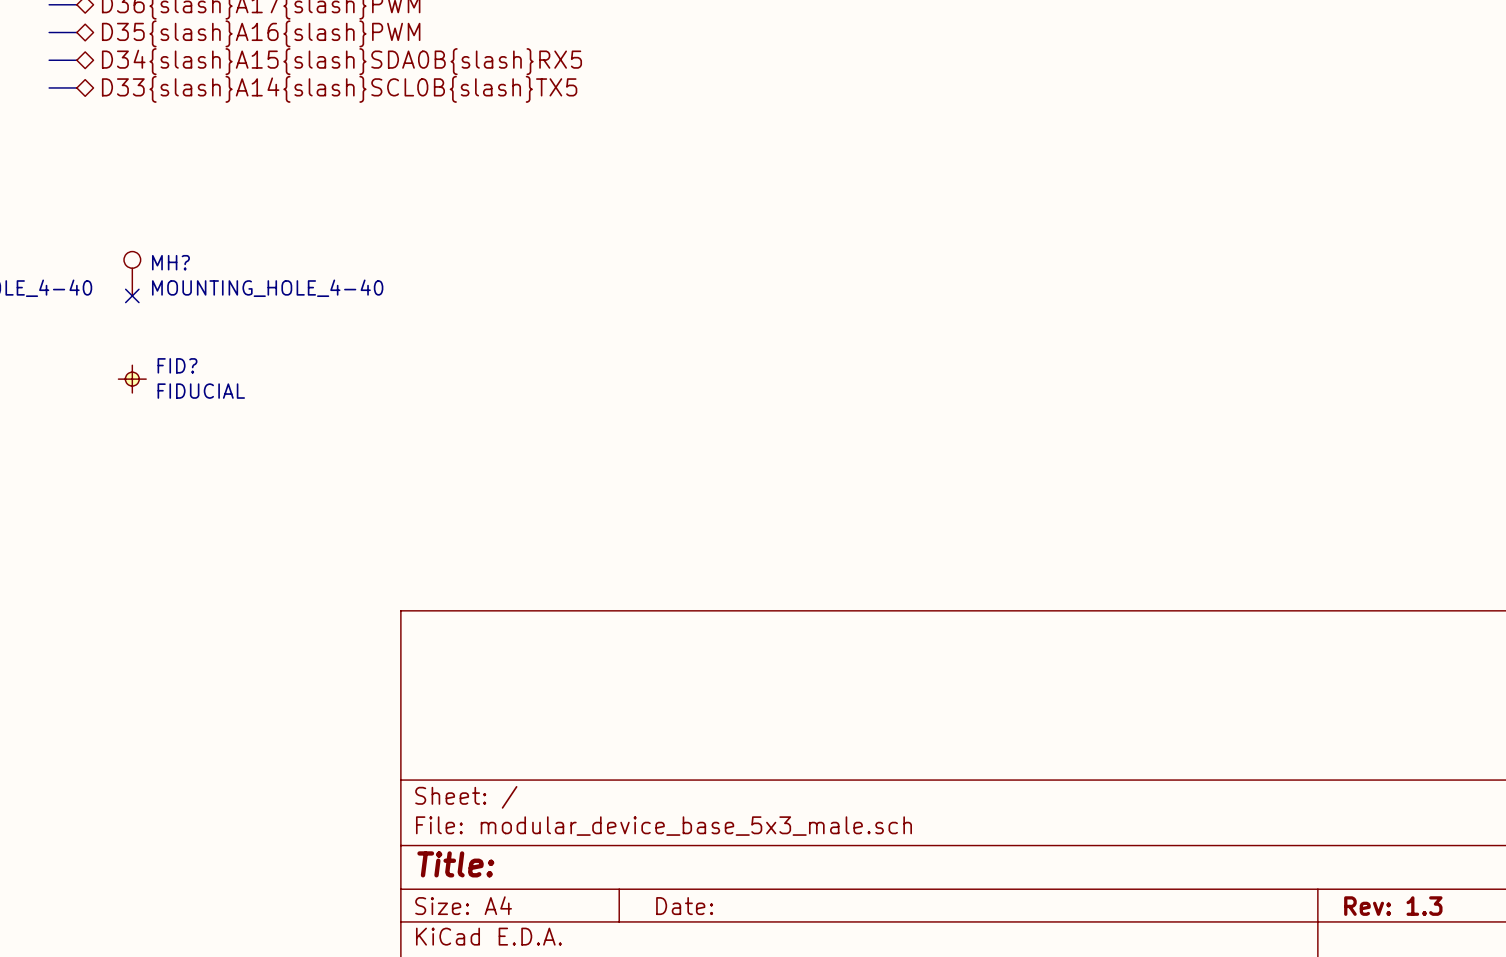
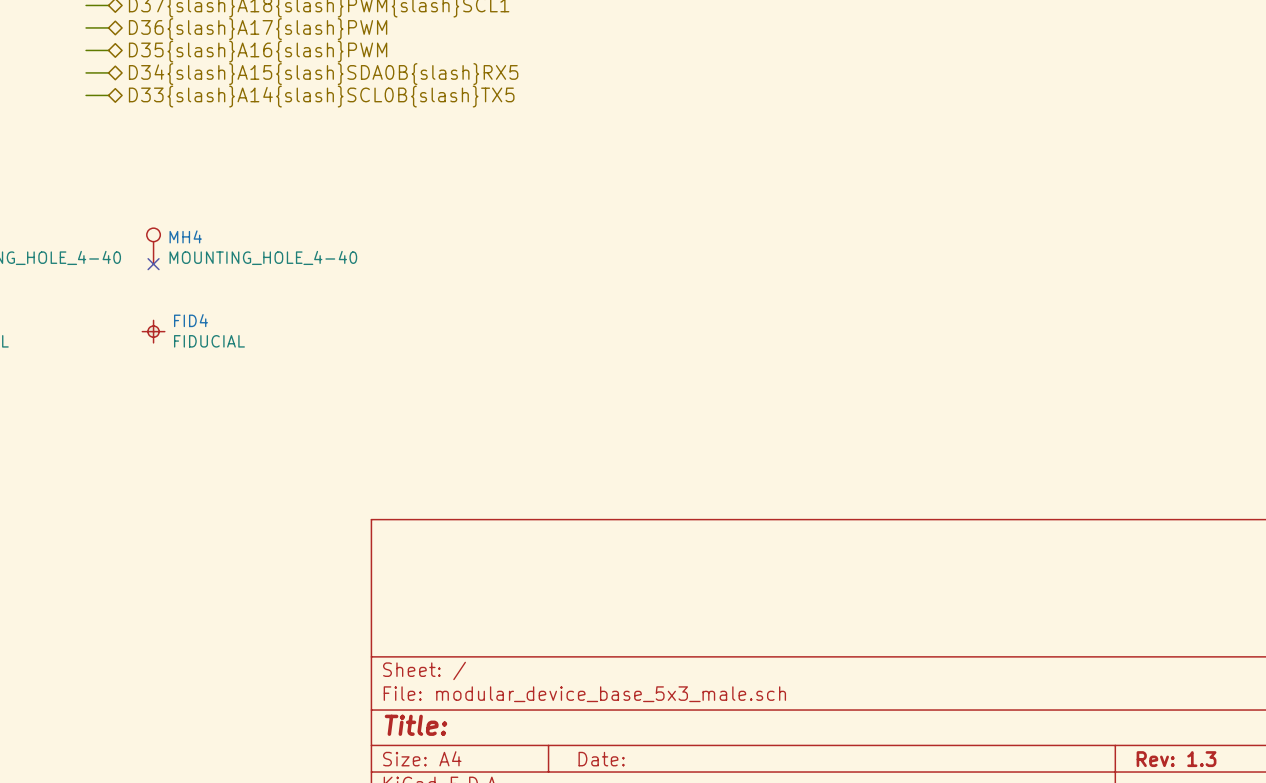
MH? name: MH? (170, 262) -> MH4 (185, 236)
FID? name: FID? (177, 365) -> FID4 (191, 320)

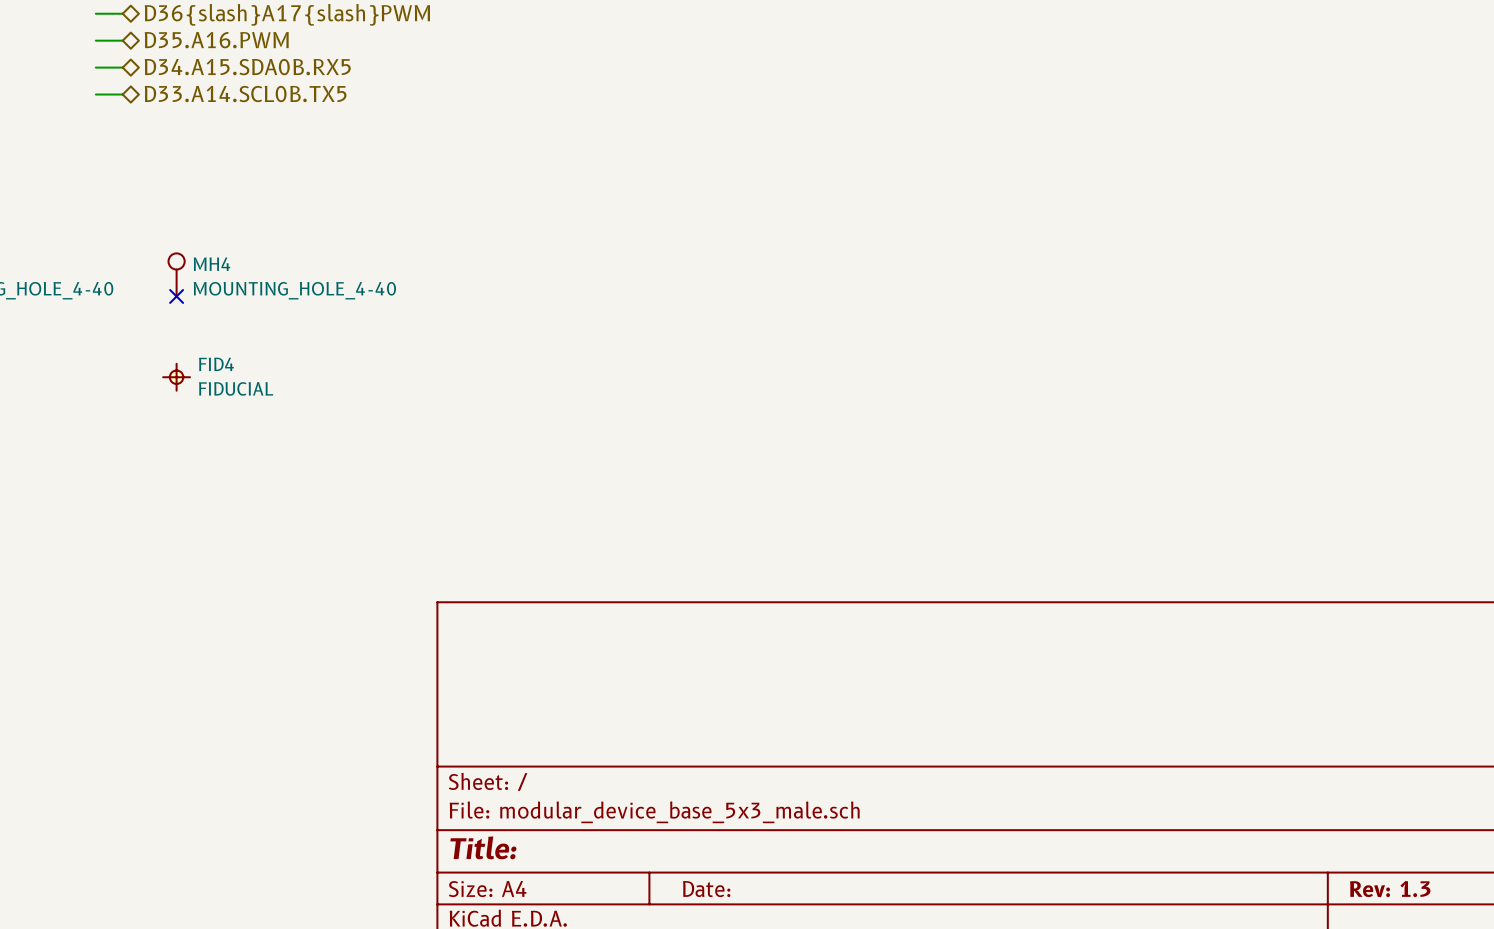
hierarchical label: D35{slash}A16{slash}PWM (258, 51) -> D35.A16.PWM (216, 40)
hierarchical label: D34{slash}A15{slash}SDA0B{slash}RX5 (323, 74) -> D34.A15.SDA0B.RX5 (247, 67)
hierarchical label: D33{slash}A14{slash}SCL0B{slash}TX5 (321, 96) -> D33.A14.SCL0B.TX5 (245, 94)

